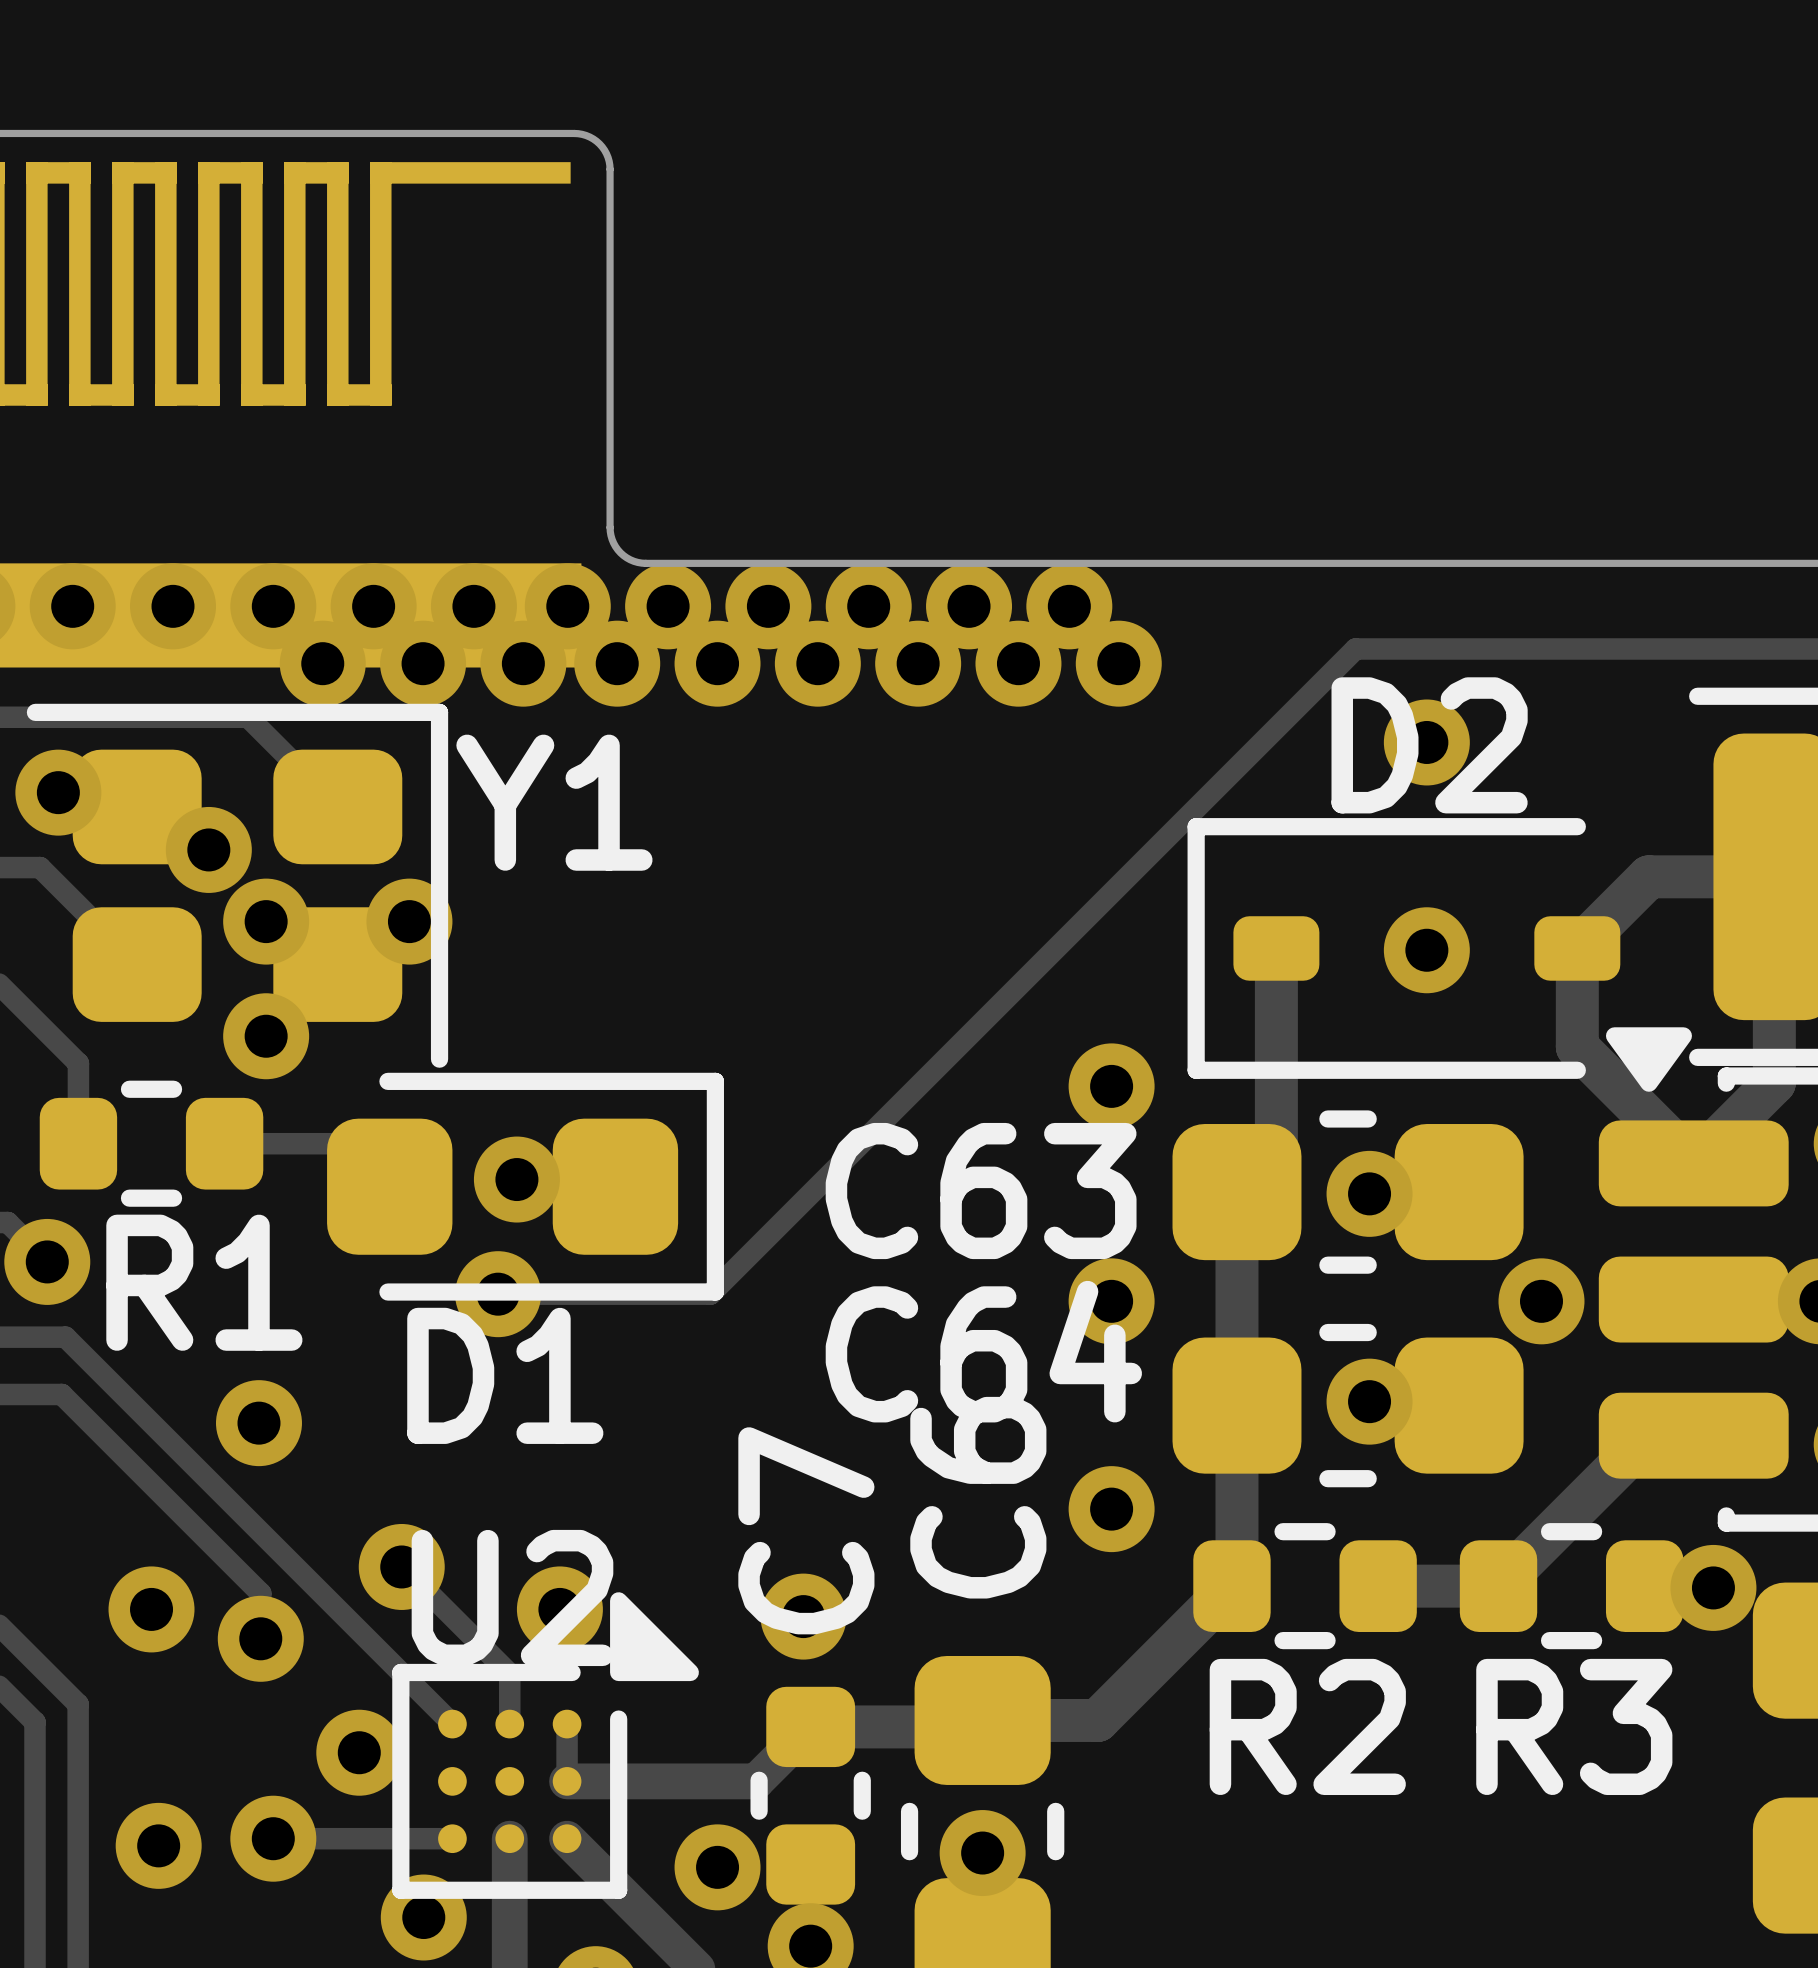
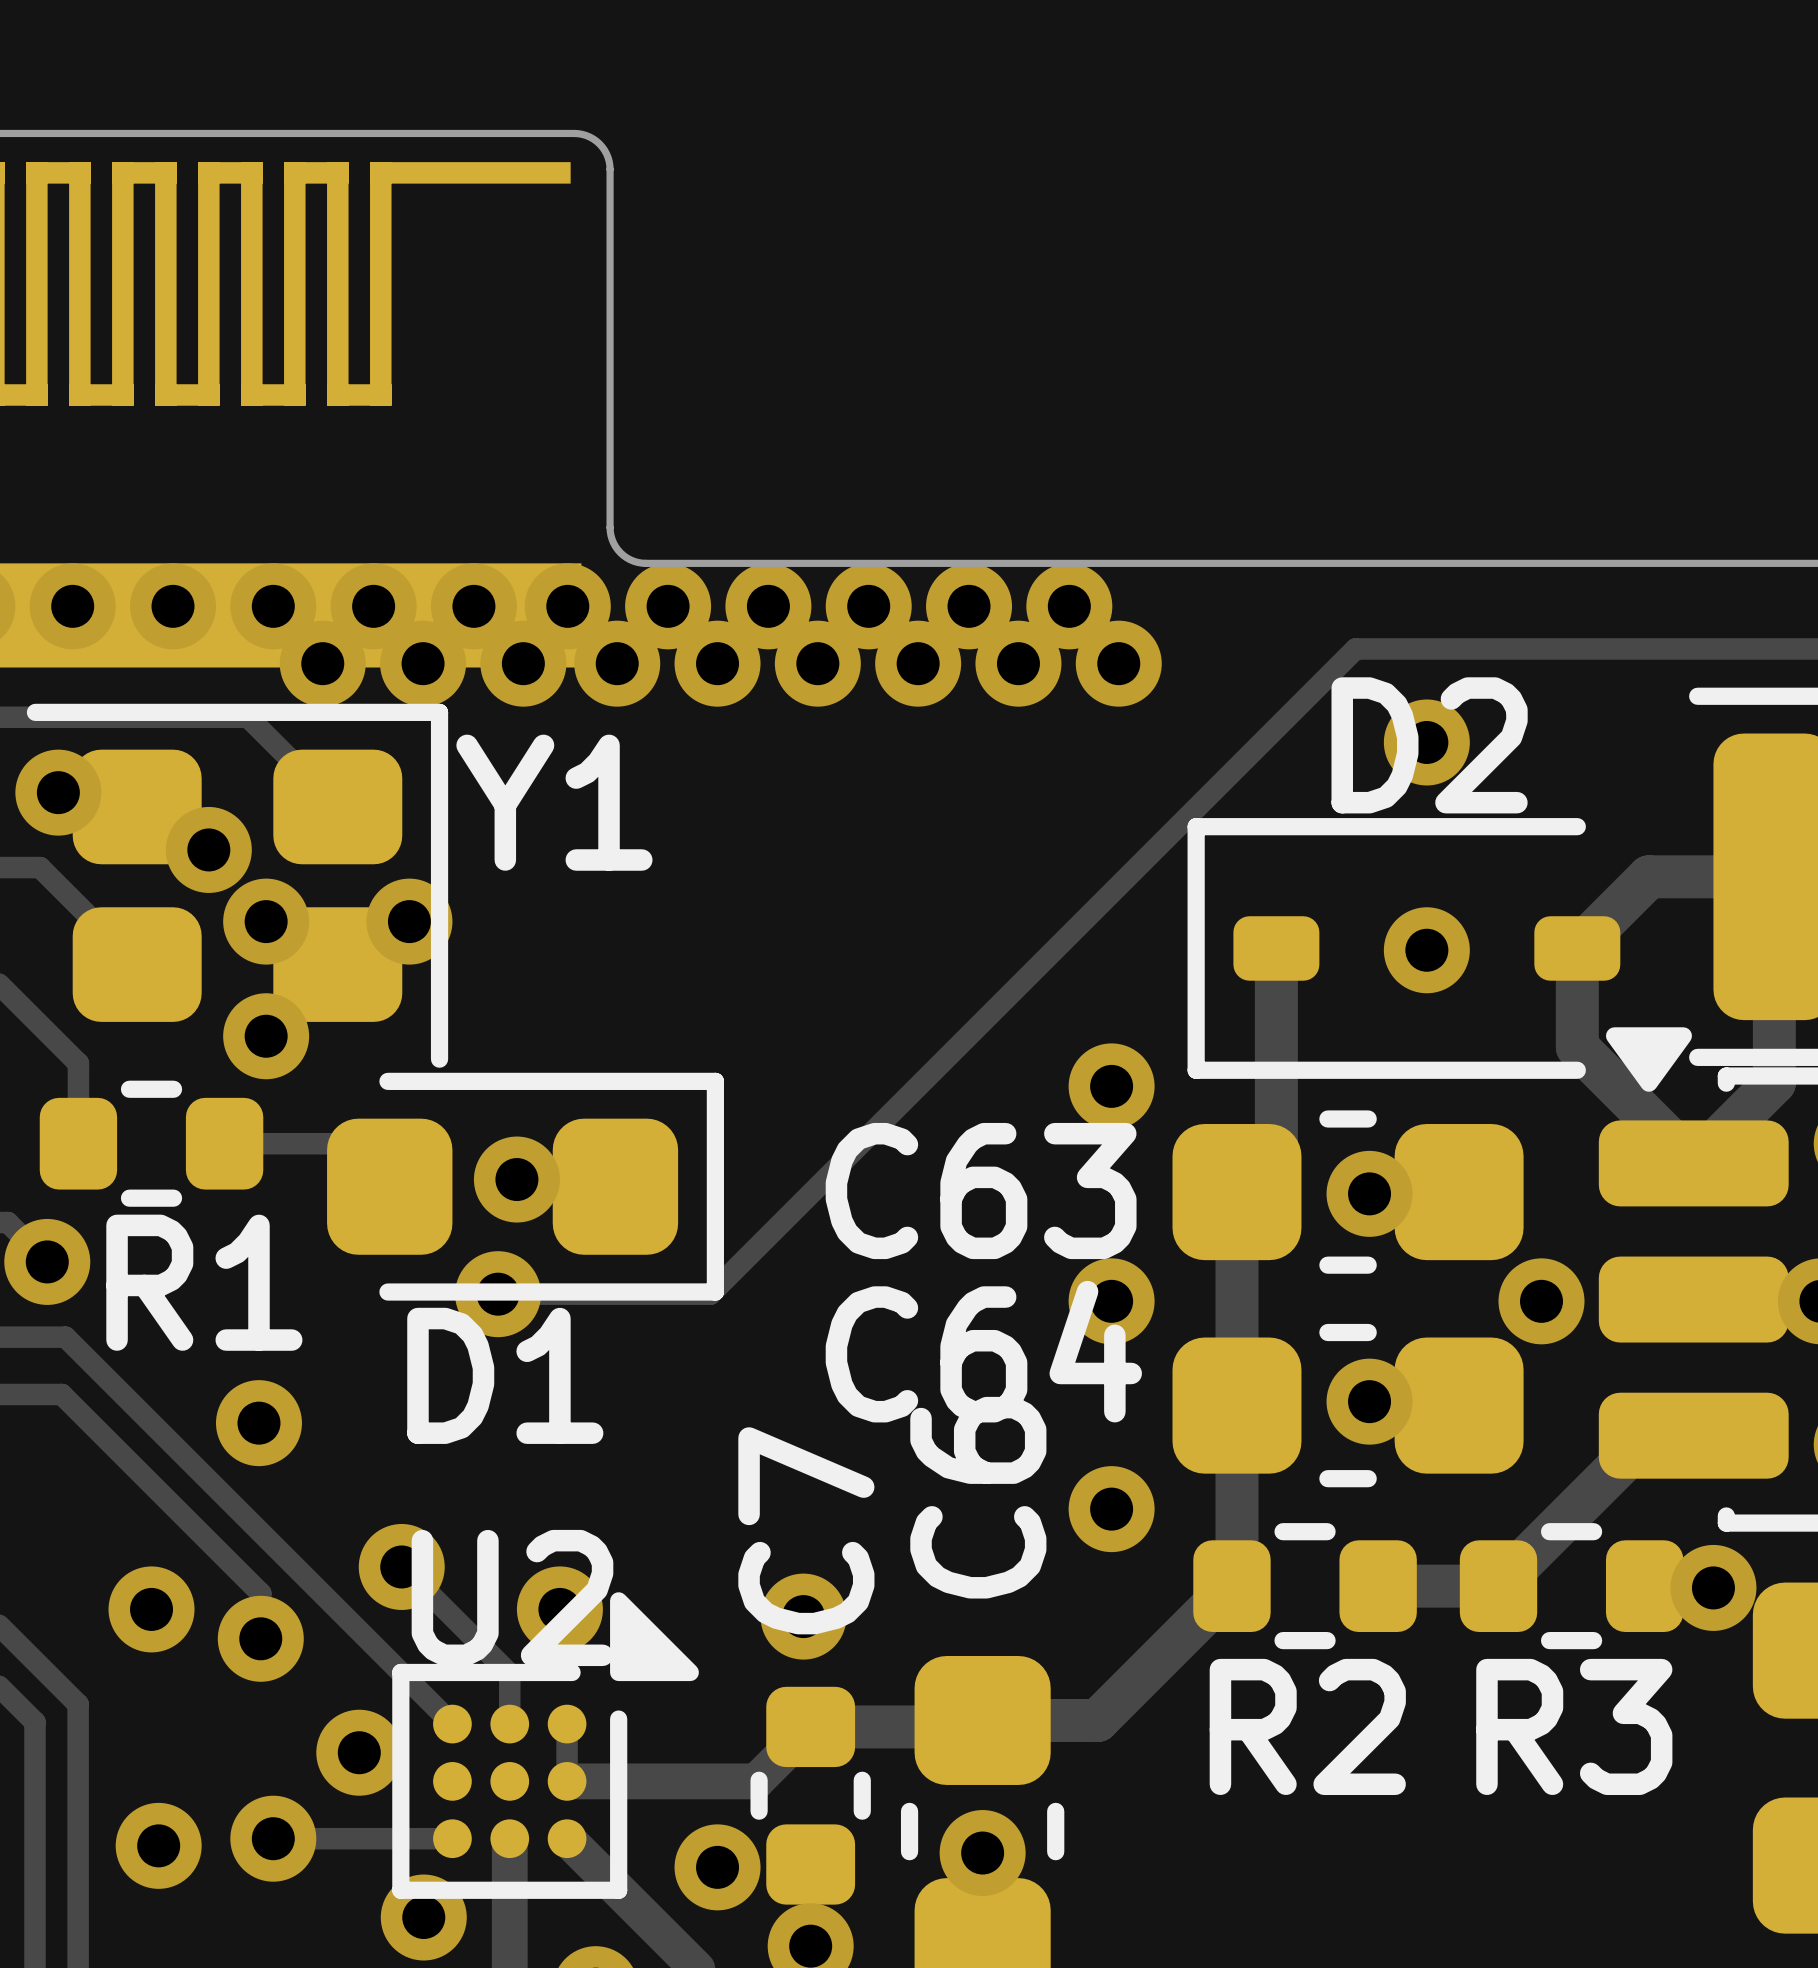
U2 footprint: [392, 1592, 699, 1899] -> [392, 1592, 699, 1899]

